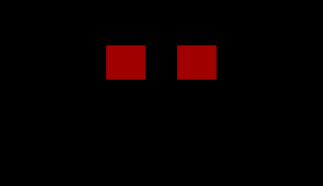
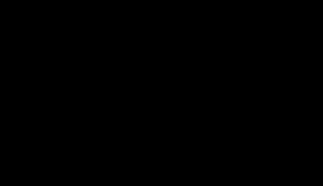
part: (161, 62) -> none

